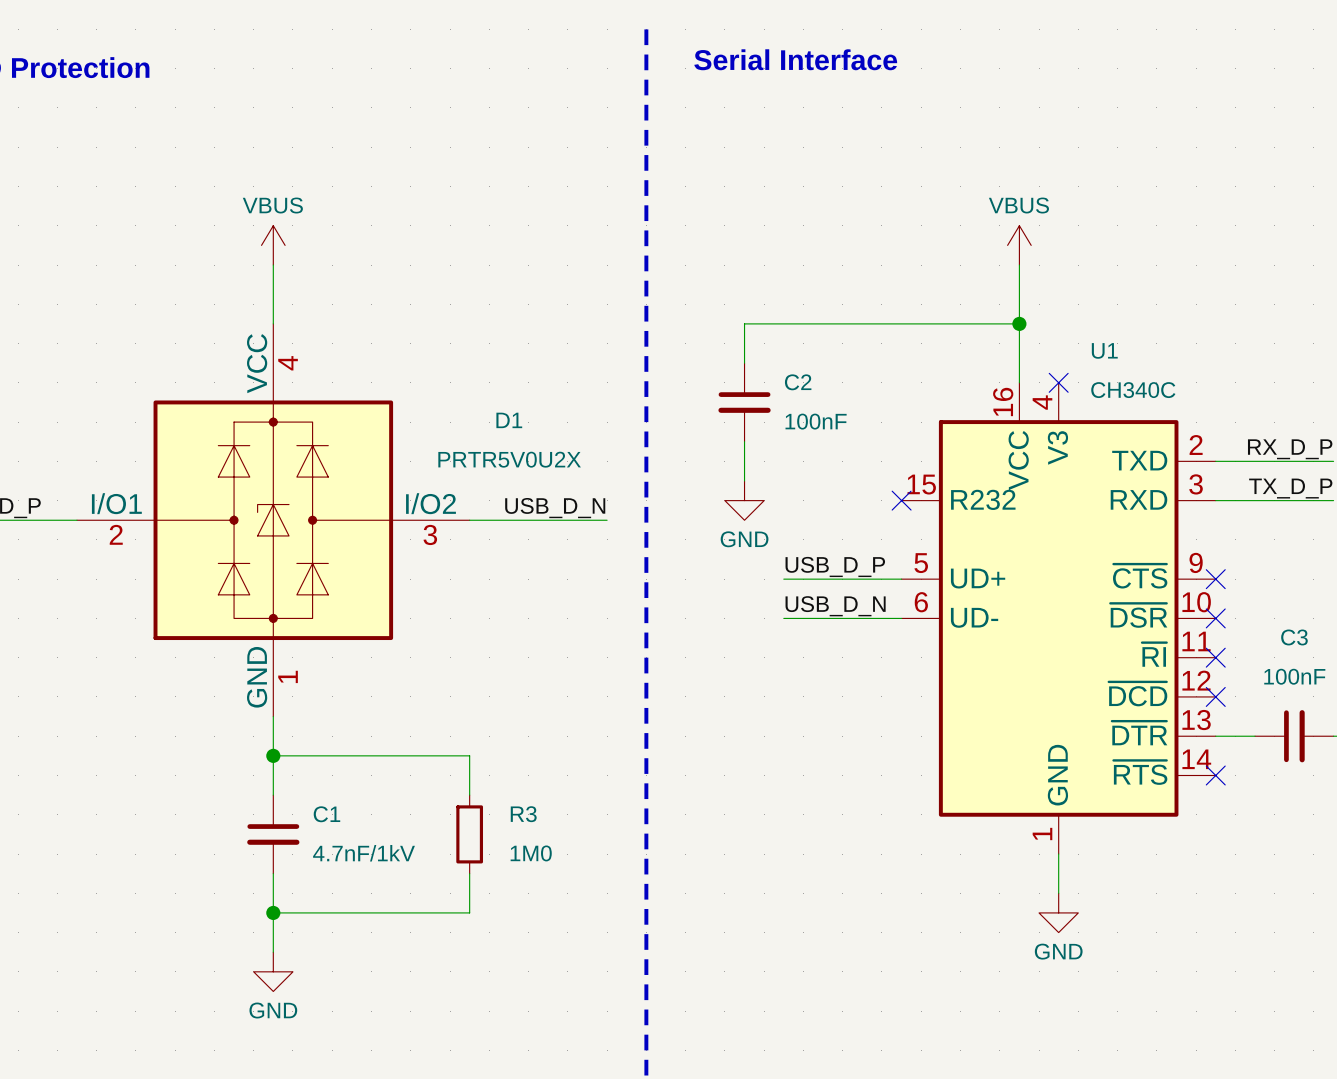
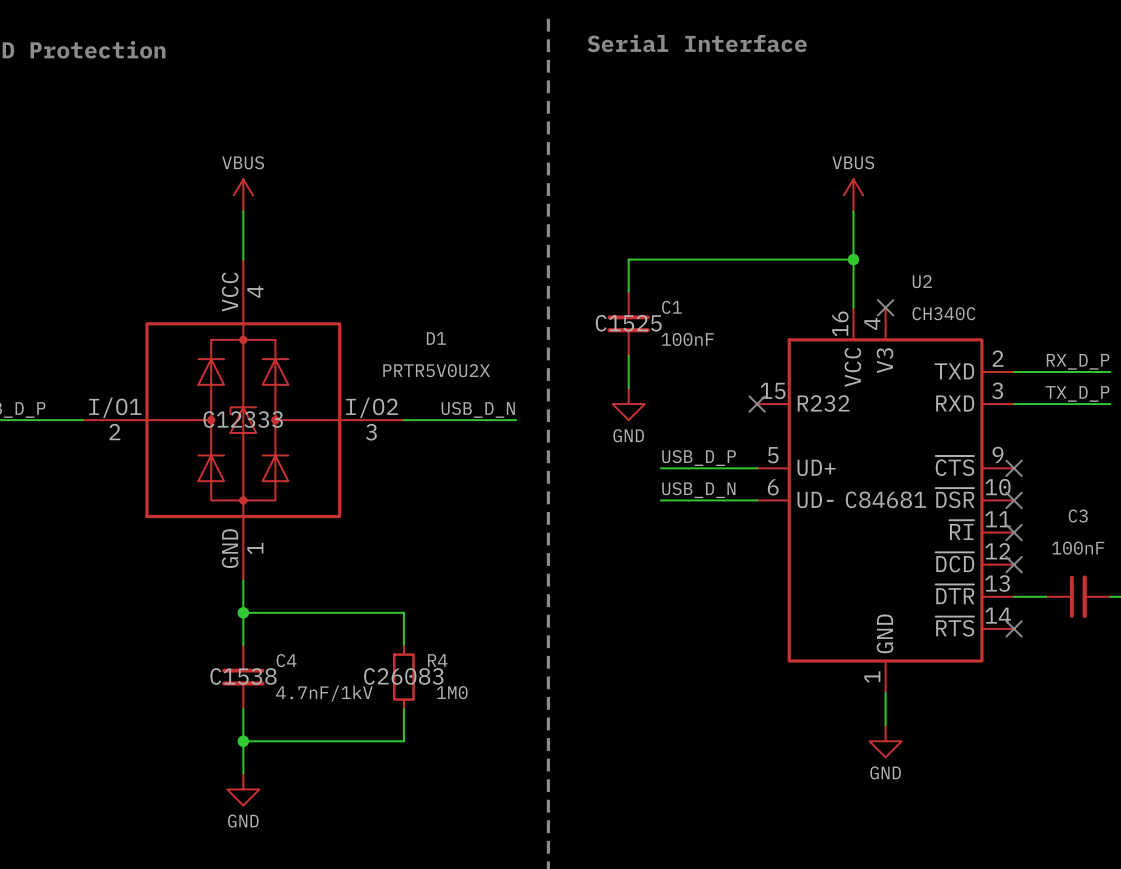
U1 name: U1 (1104, 350) -> U2 (922, 281)
C2 name: C2 (798, 382) -> C1 (671, 307)
C2 text: none -> C1525 (628, 323)
D1 text: none -> C12333 (243, 419)
U1 text: none -> C84681 (885, 499)
C1 name: C1 (326, 814) -> C4 (286, 660)
R3 name: R3 (523, 814) -> R4 (437, 660)
C1 text: none -> C1538 (243, 676)
R3 text: none -> C26083 (403, 676)

